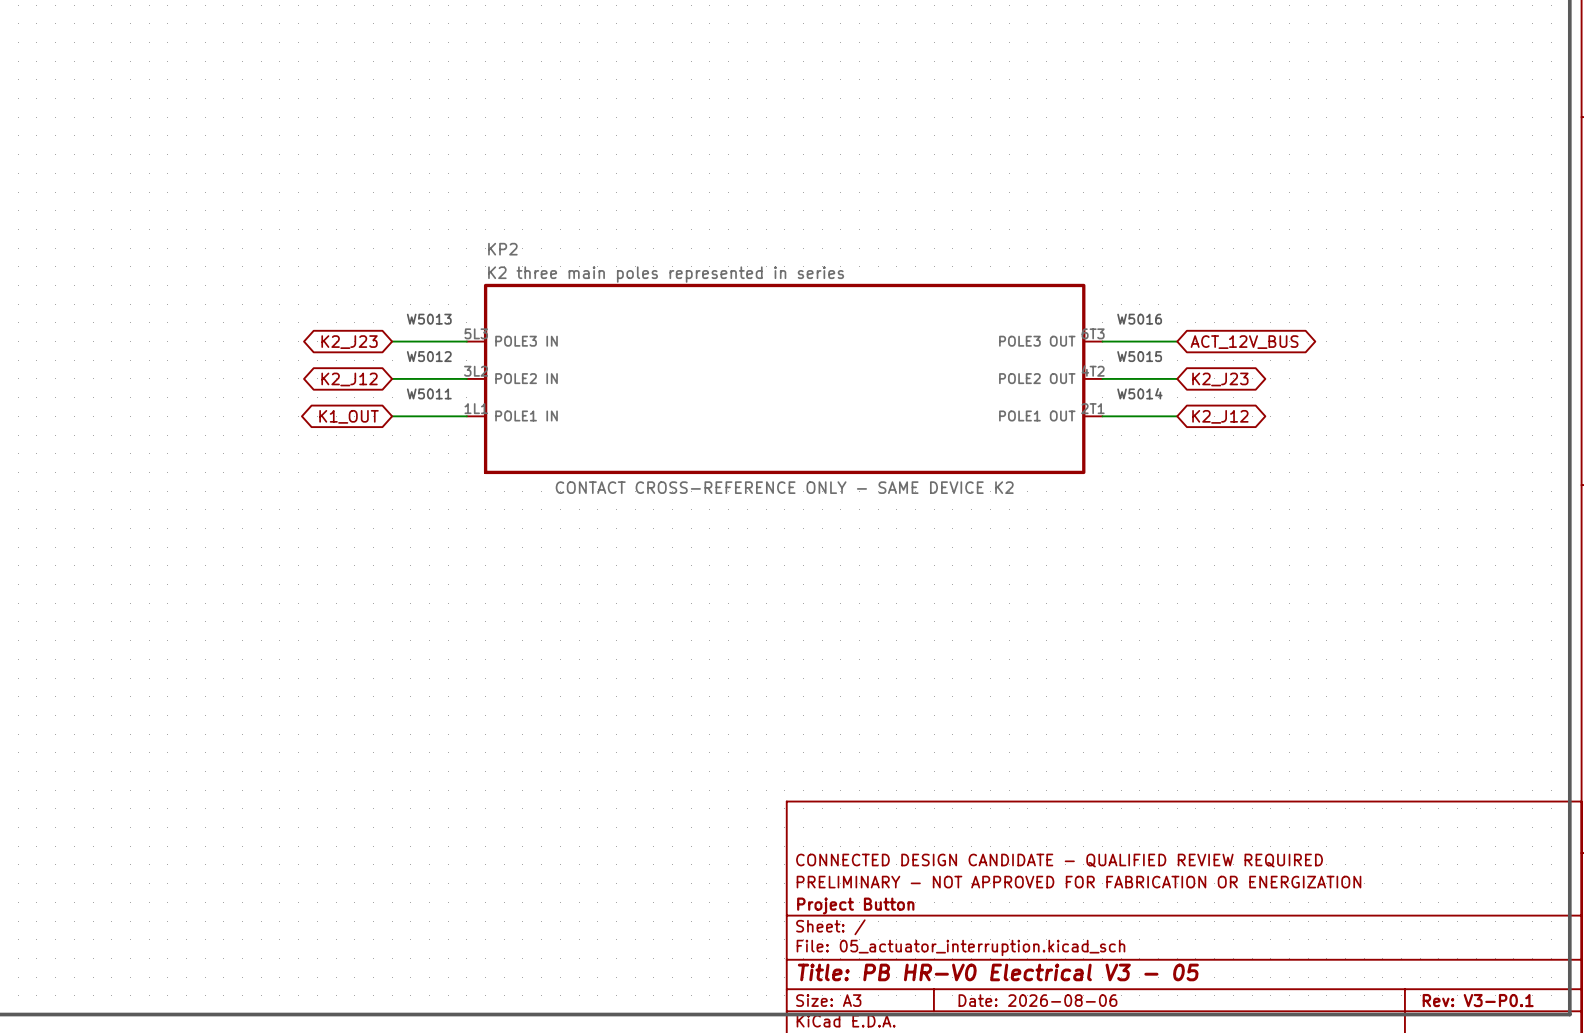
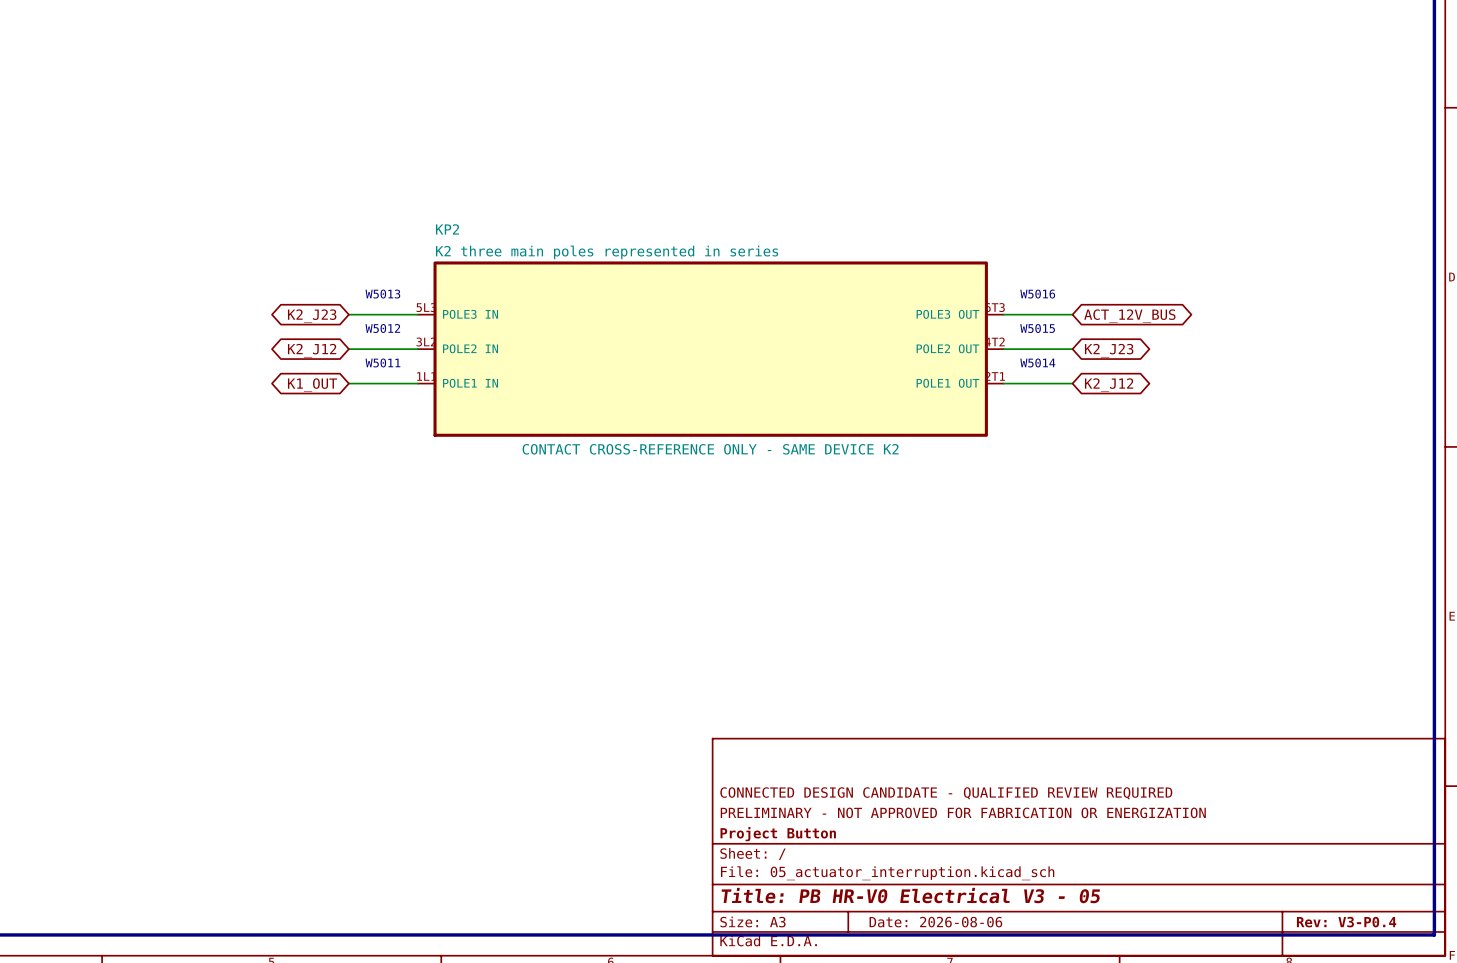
title block: Rev: V3-P0.1 (1478, 1000) -> Rev: V3-P0.4 (1346, 922)

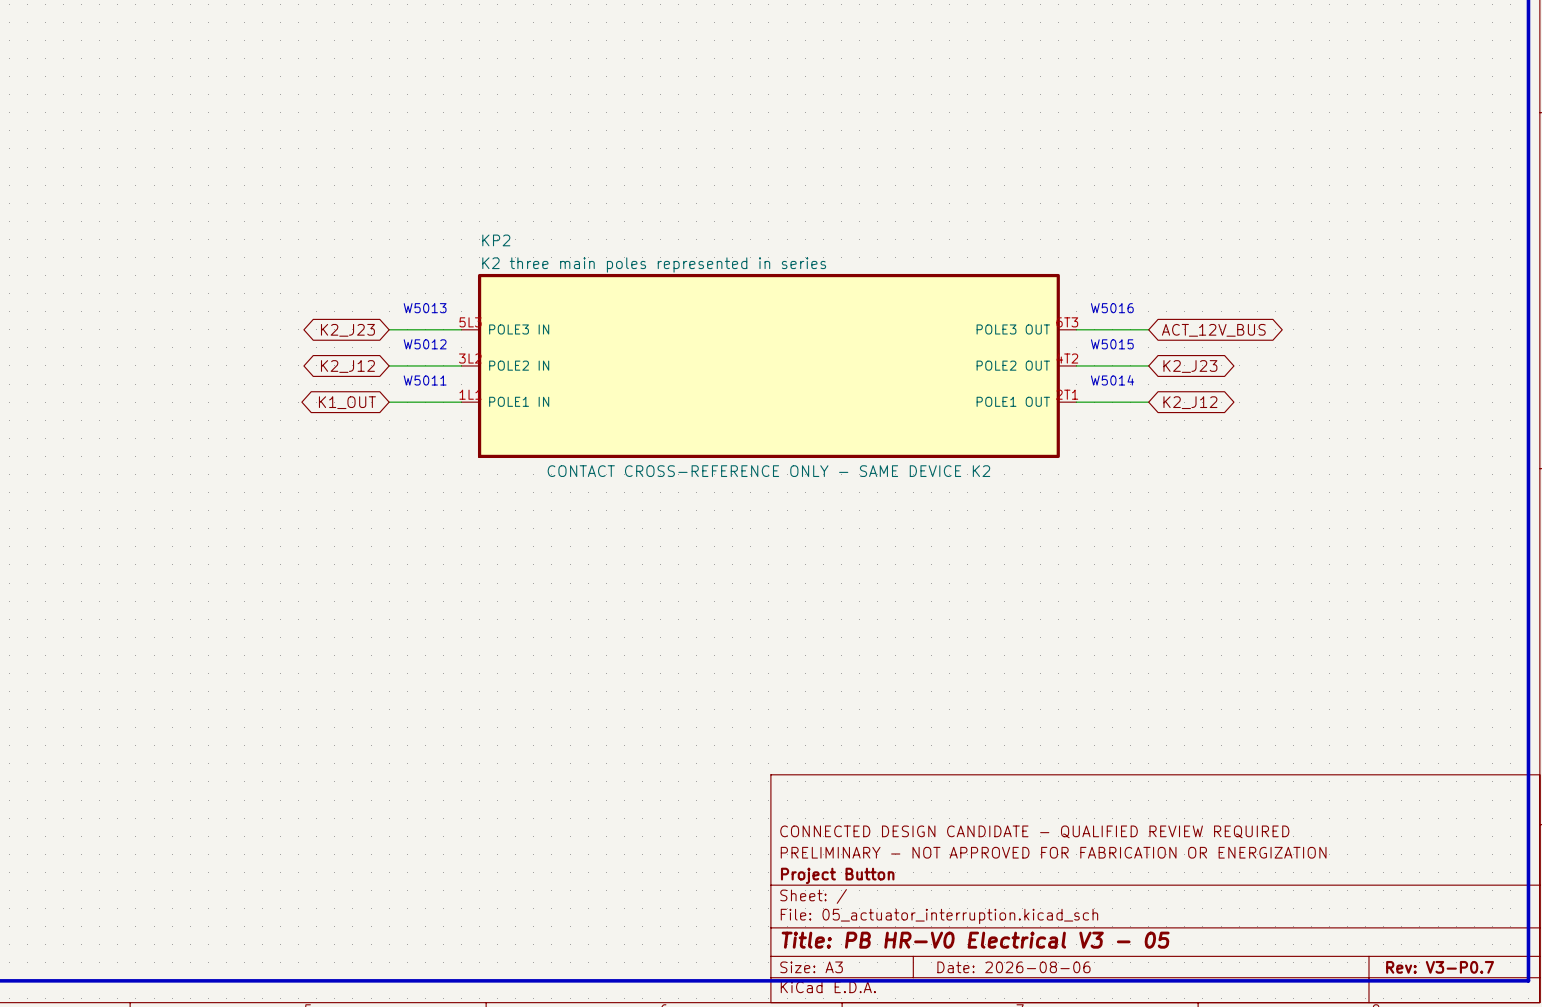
title block: Rev: V3-P0.4 (1346, 922) -> Rev: V3-P0.7 (1440, 967)

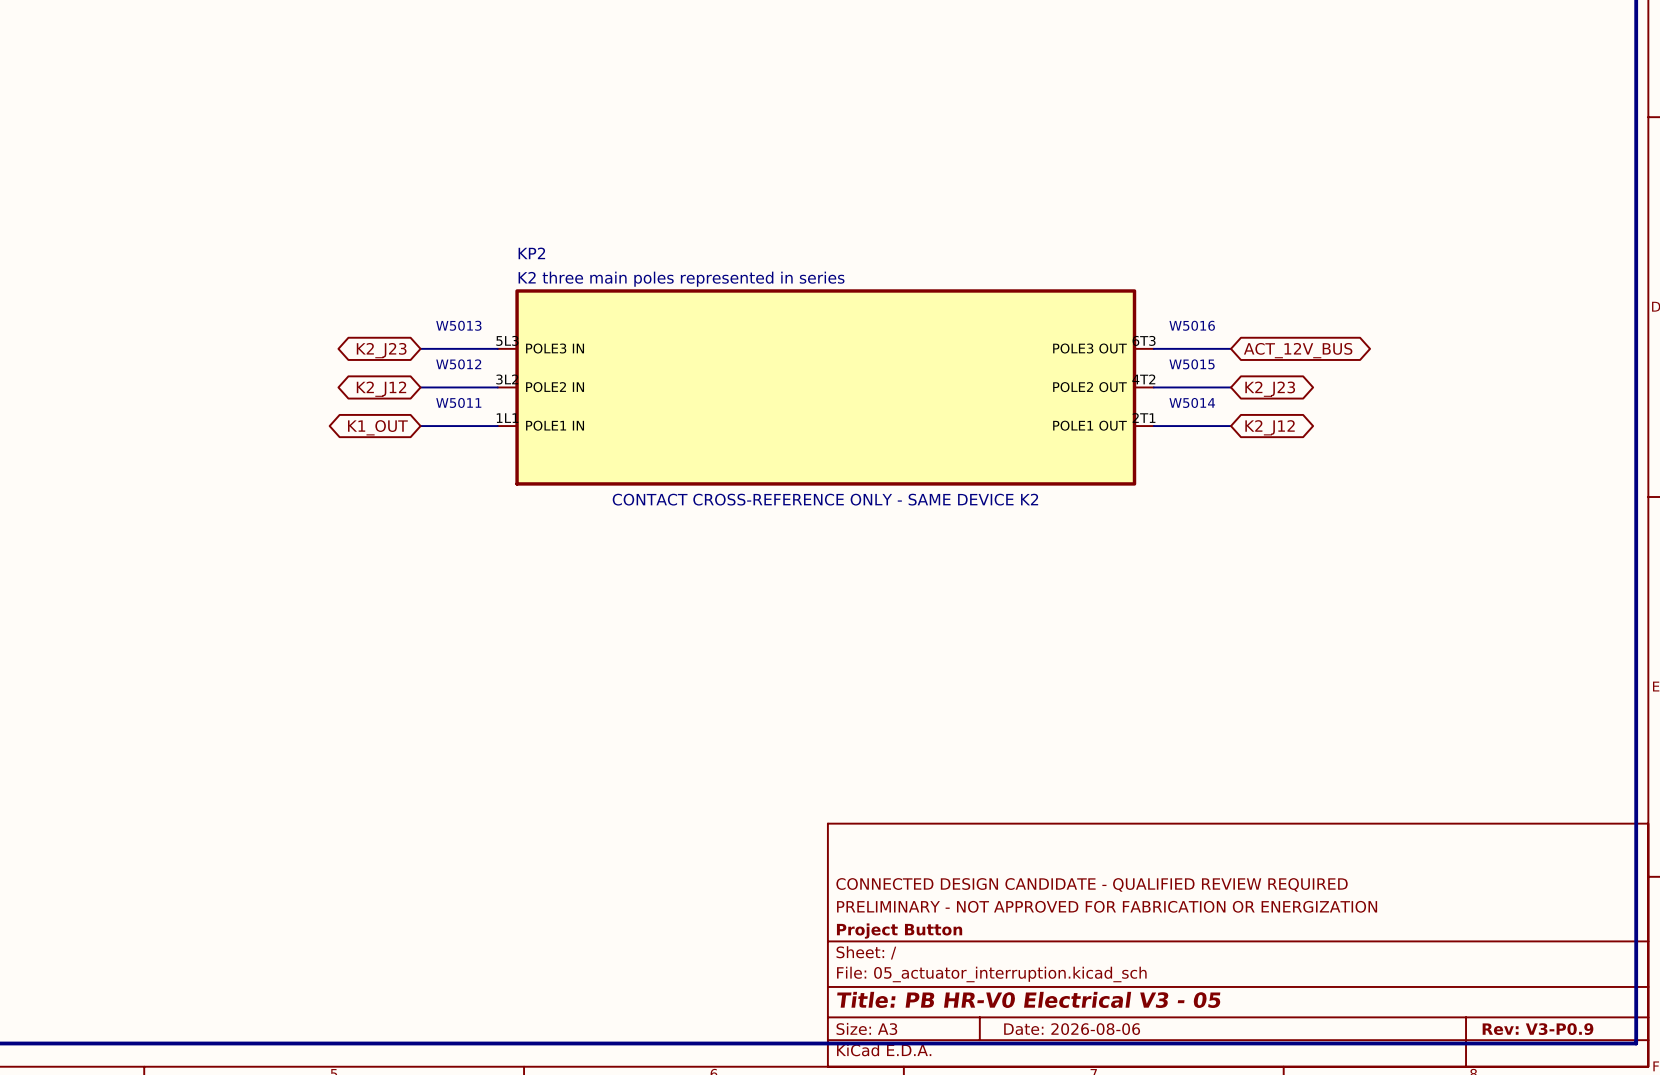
title block: Rev: V3-P0.7 (1440, 967) -> Rev: V3-P0.9 (1537, 1029)

